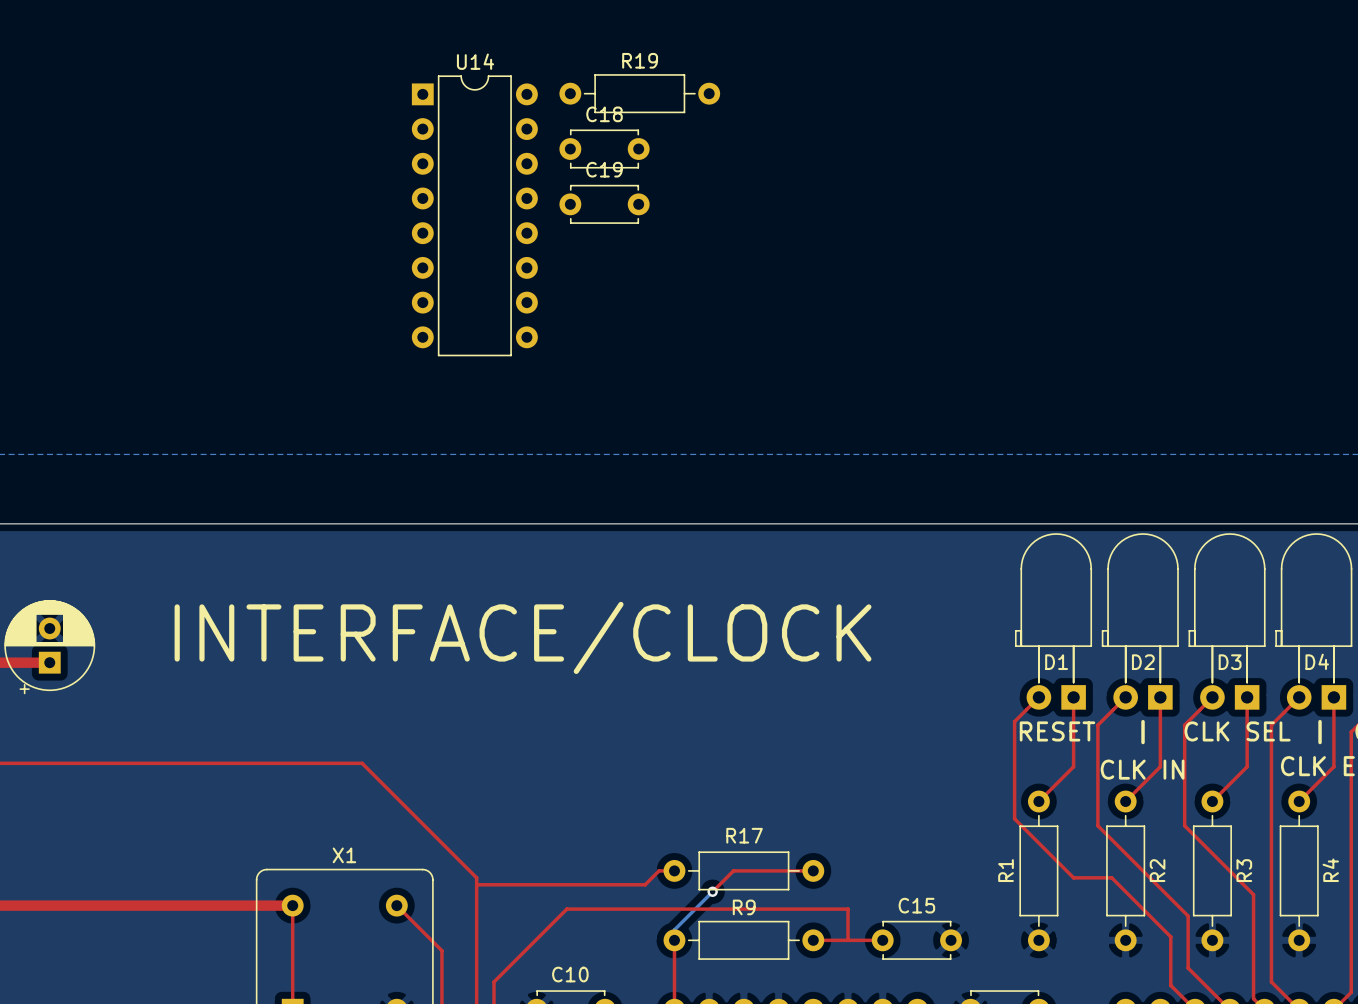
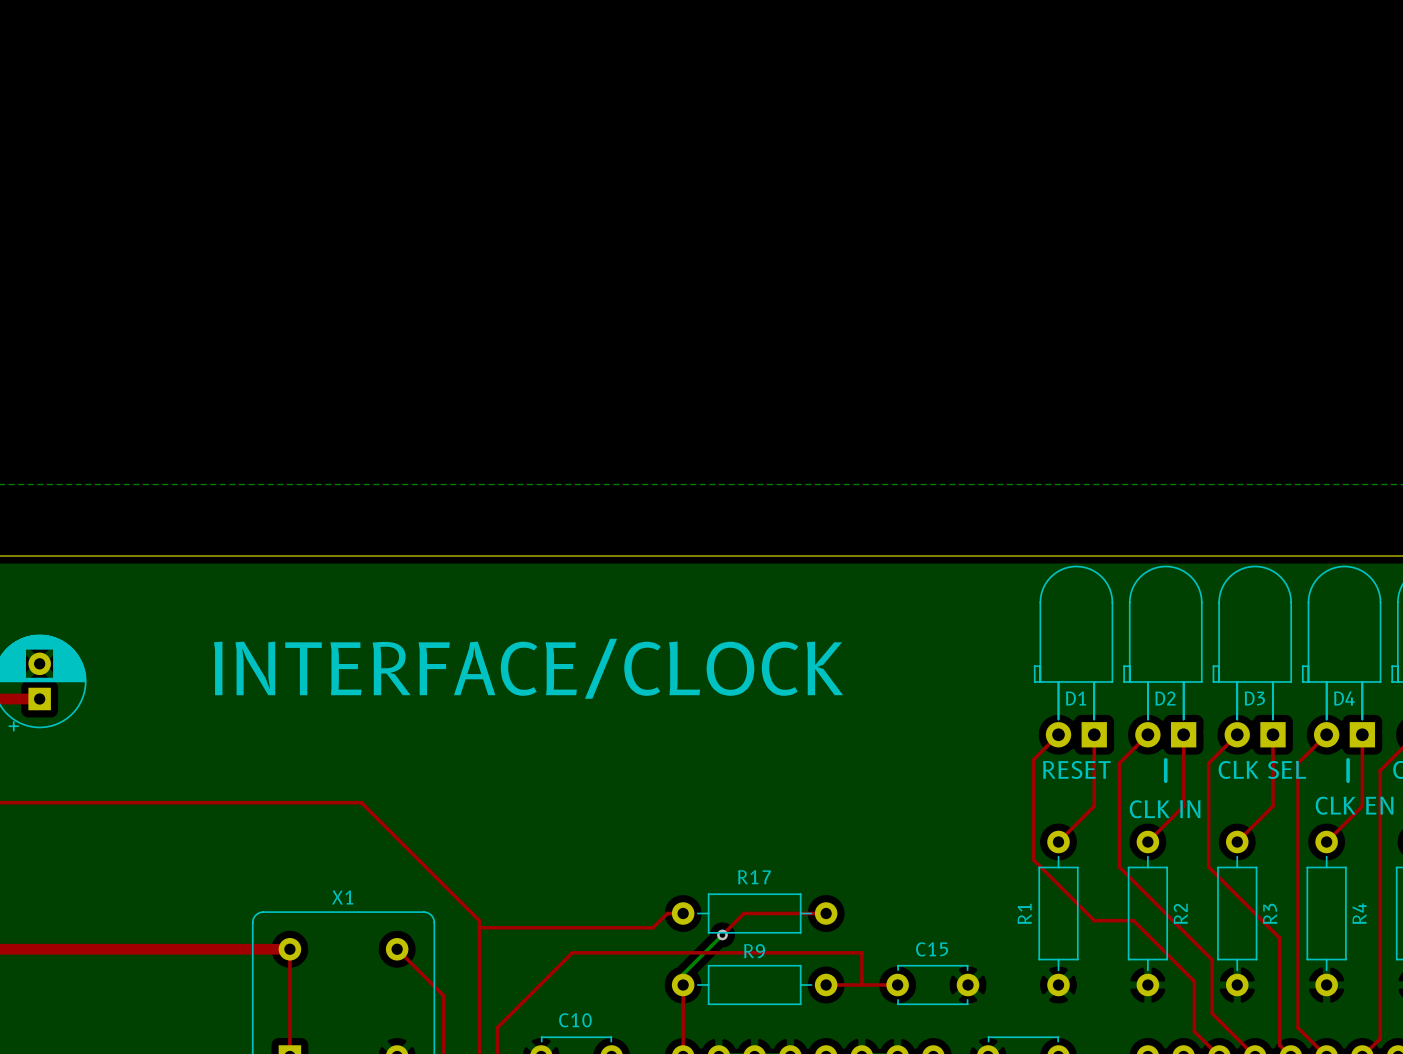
R19: (639, 93) -> none
C18: (604, 149) -> none
C19: (604, 204) -> none
U14: (474, 215) -> none

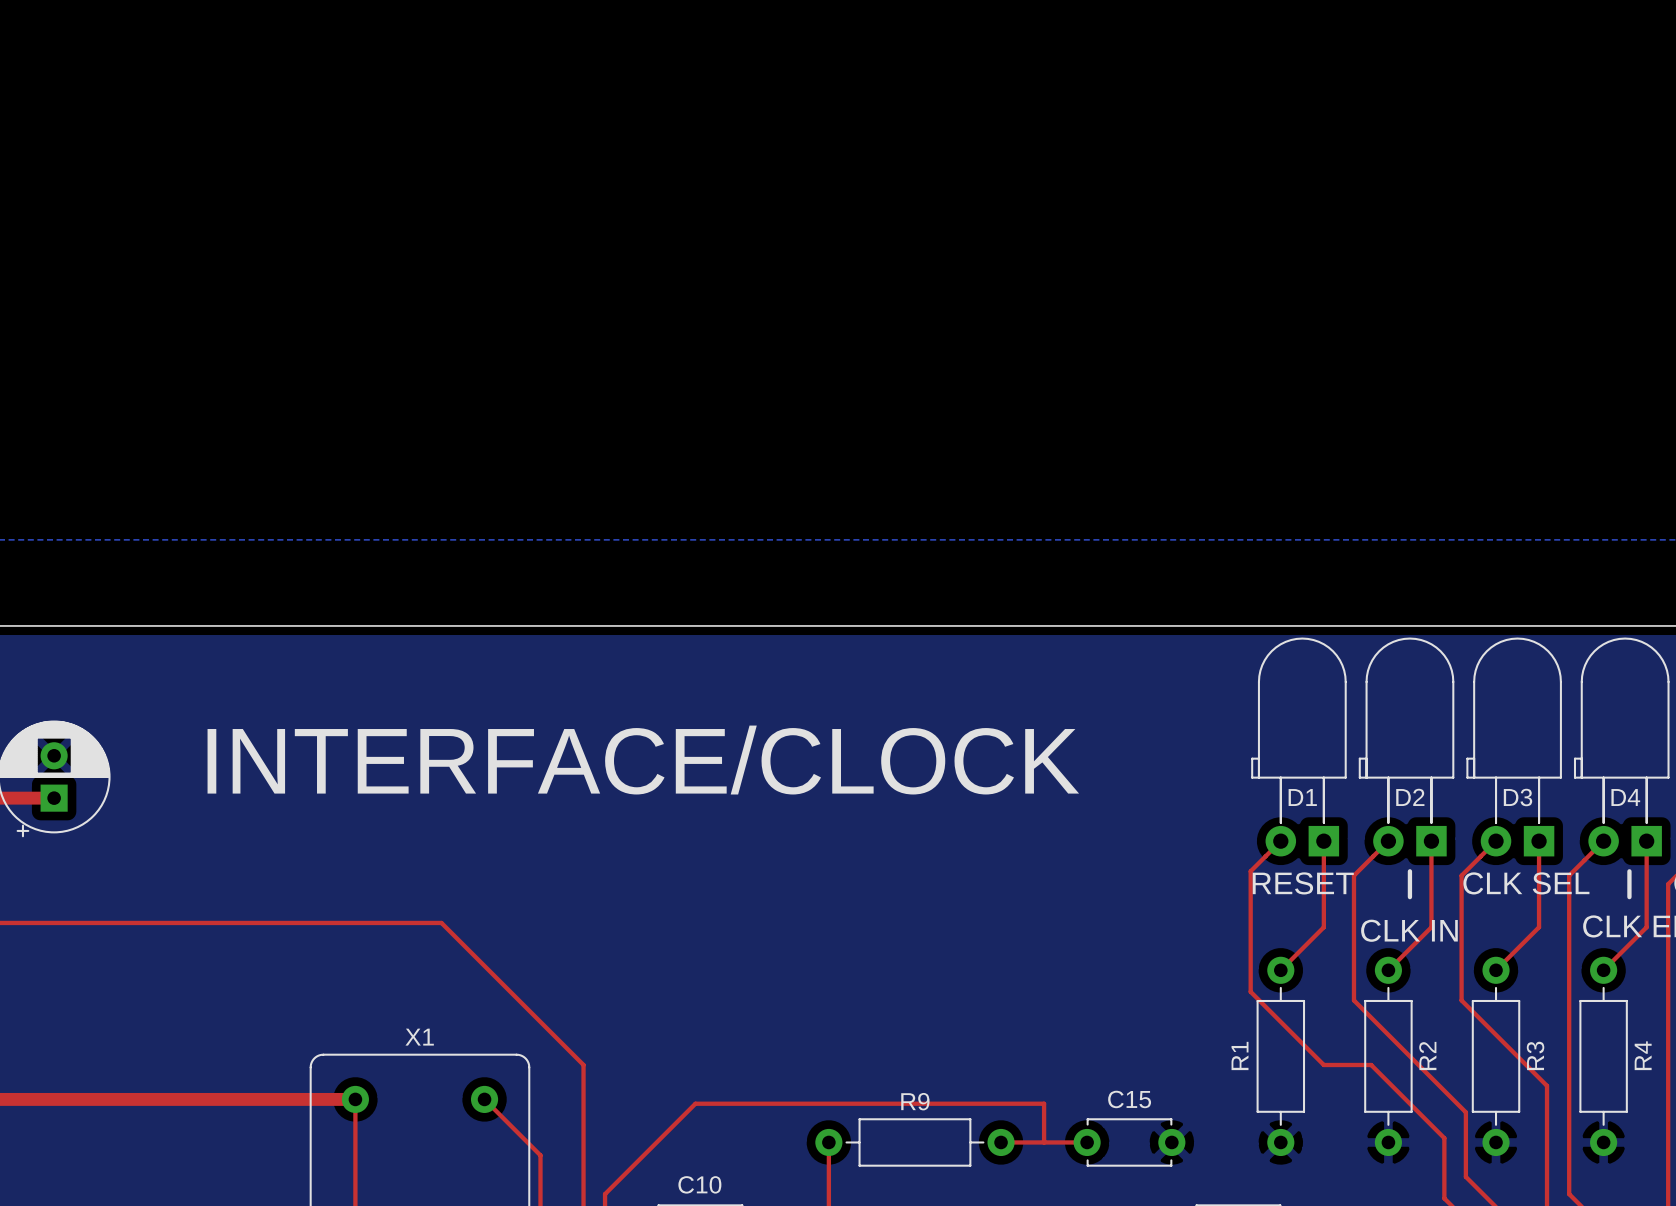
top track: (683, 913) (667, 913) (652, 927) (479, 927) -> none
R17: (754, 913) -> none
top track: (826, 913) (743, 913) (722, 934) -> none
bottom track: (722, 934) (683, 974) (683, 985) -> none
via: (722, 934) -> none

